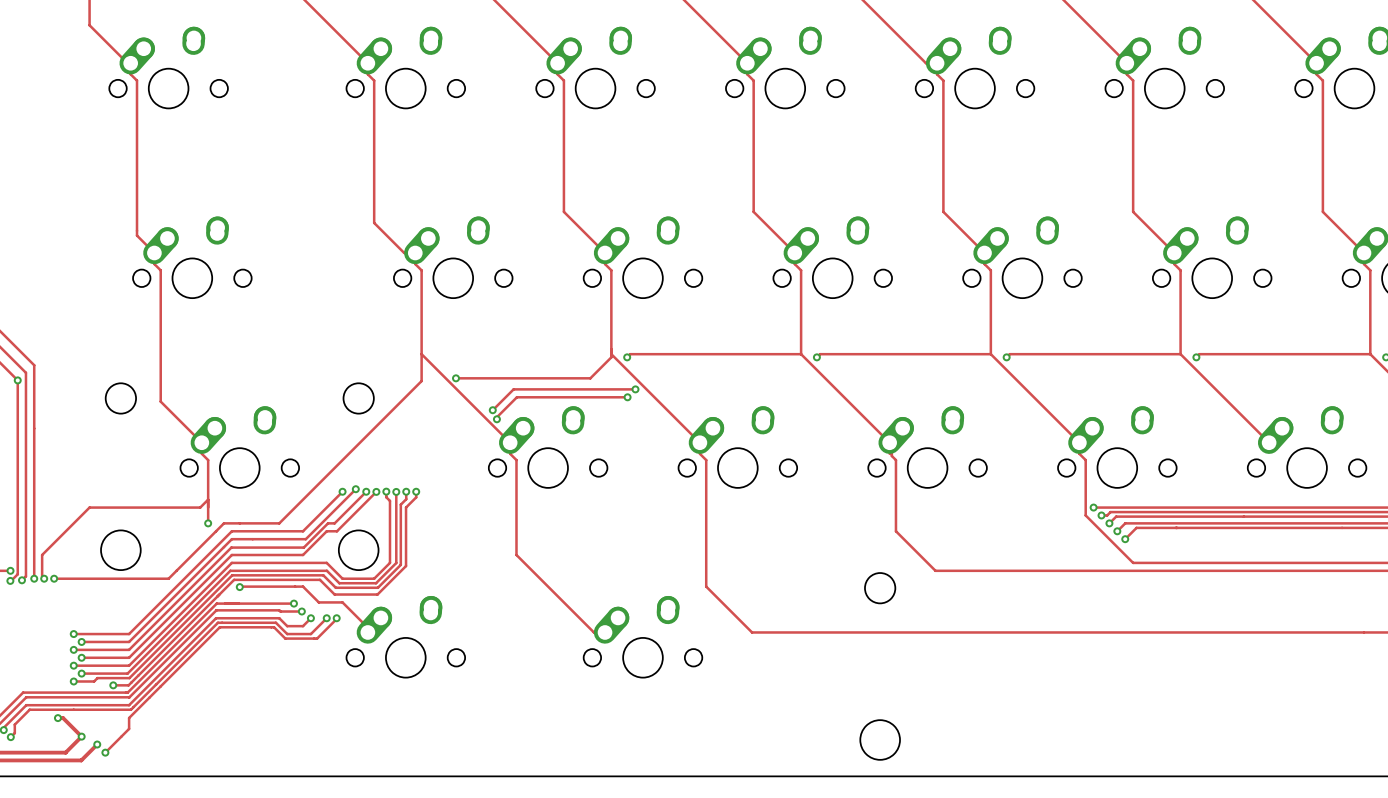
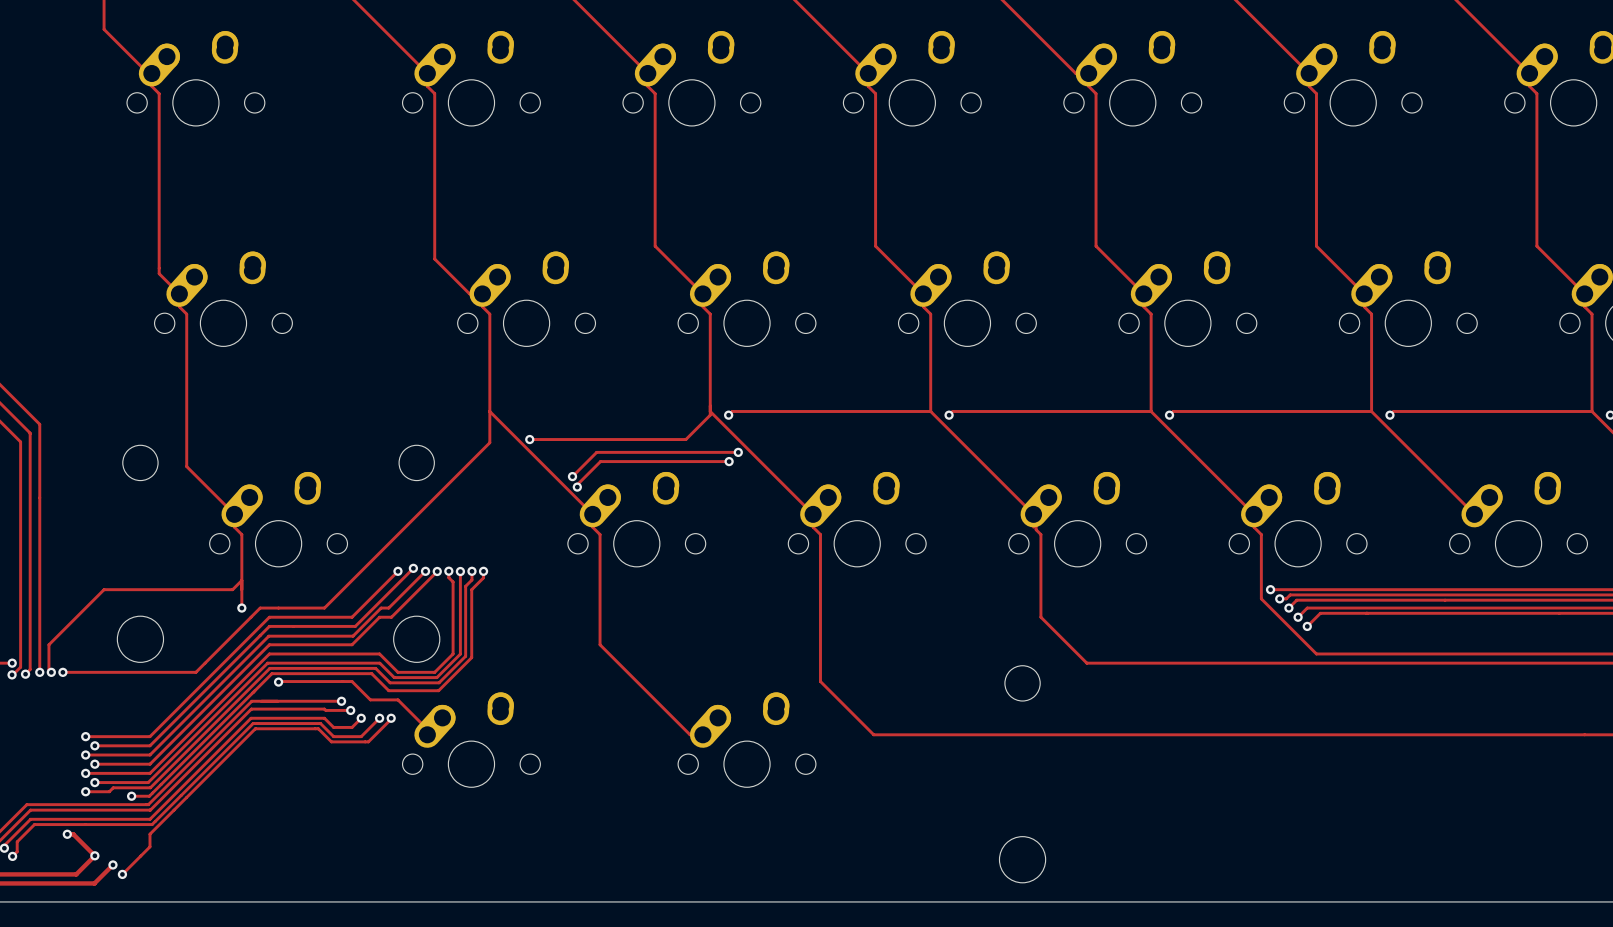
via: (17, 380) -> none

